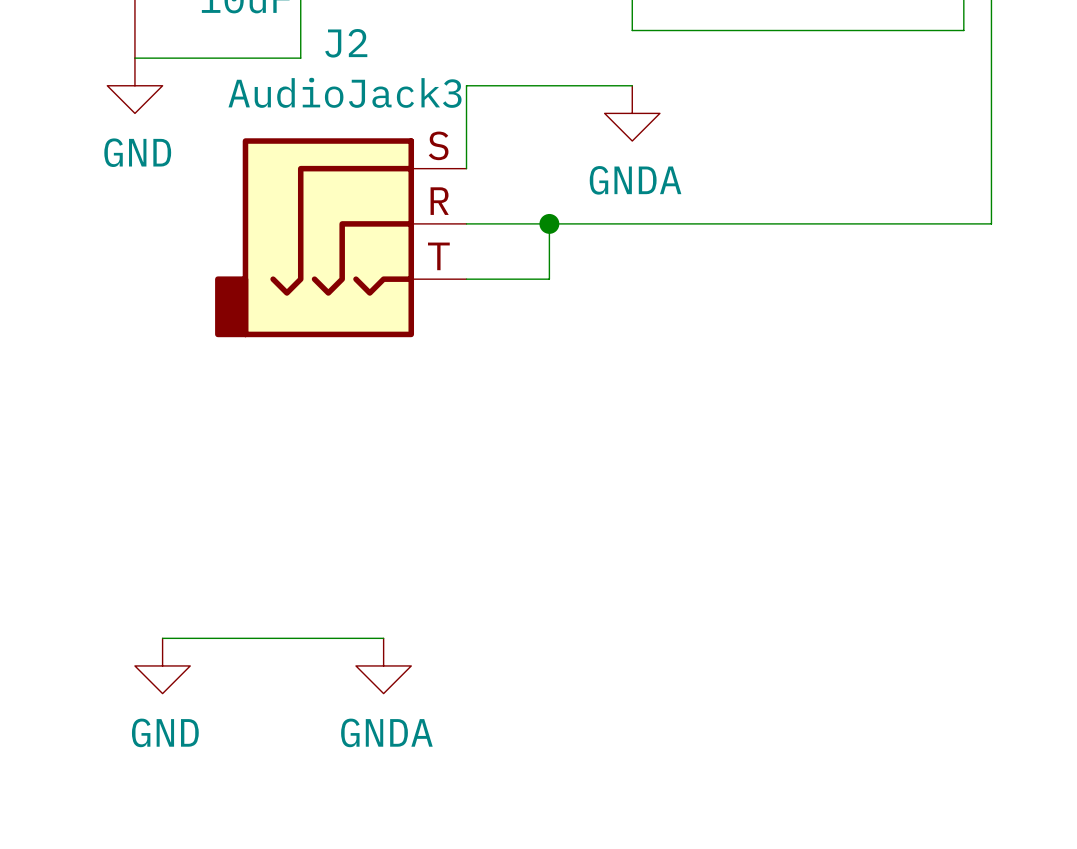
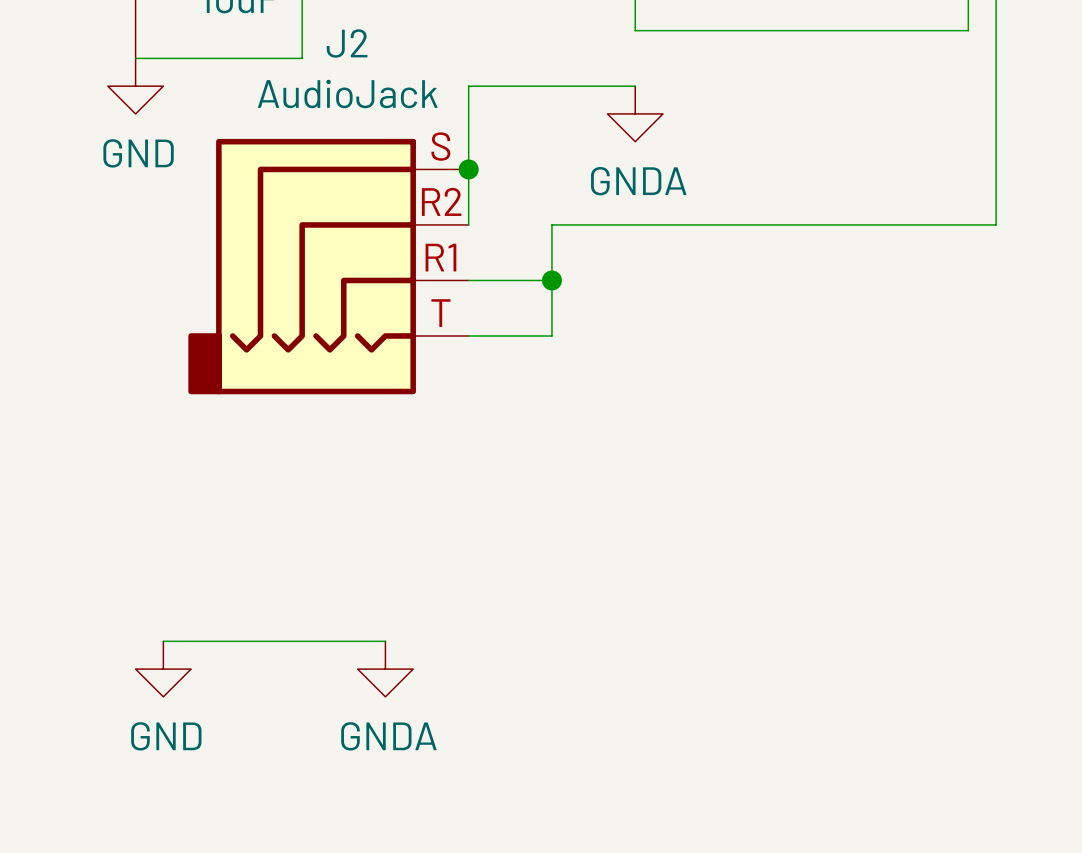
J2 value: AudioJack3 (345, 92) -> AudioJack (347, 93)
J2 symbol: [215, 138, 467, 338] -> [188, 138, 469, 395]
junction: none -> (468, 169)
wire: (466, 223) (549, 223) -> (468, 224) (468, 169)
junction: (549, 223) -> none
wire: none -> (551, 280) (551, 335) (468, 335)
junction: none -> (551, 280)

